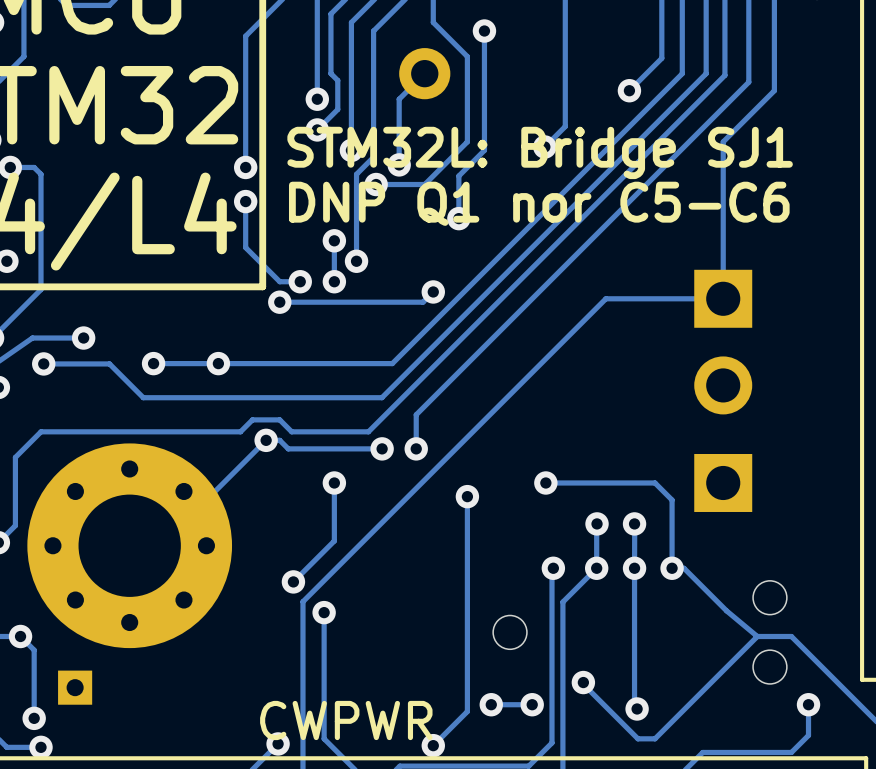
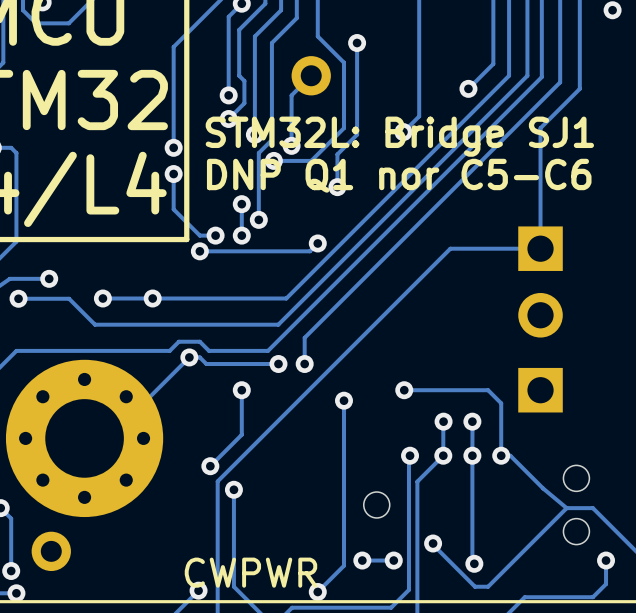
part footprint: [58, 670, 93, 705] -> [31, 531, 71, 572]

